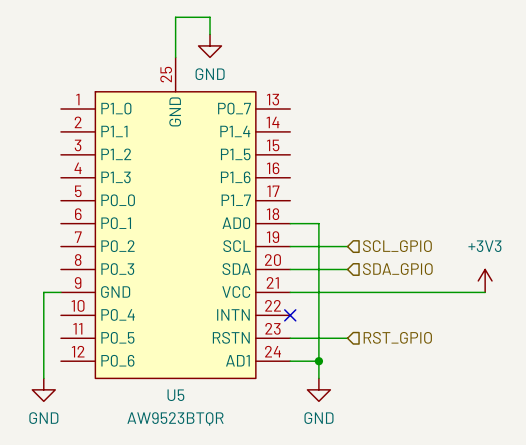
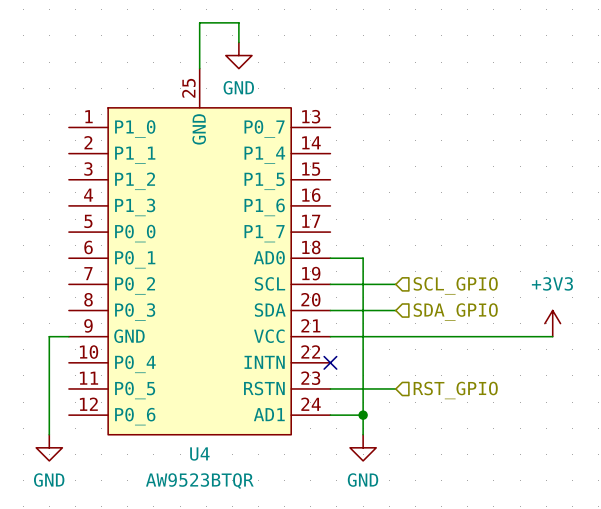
U5 name: U5 (175, 395) -> U4 (199, 454)

